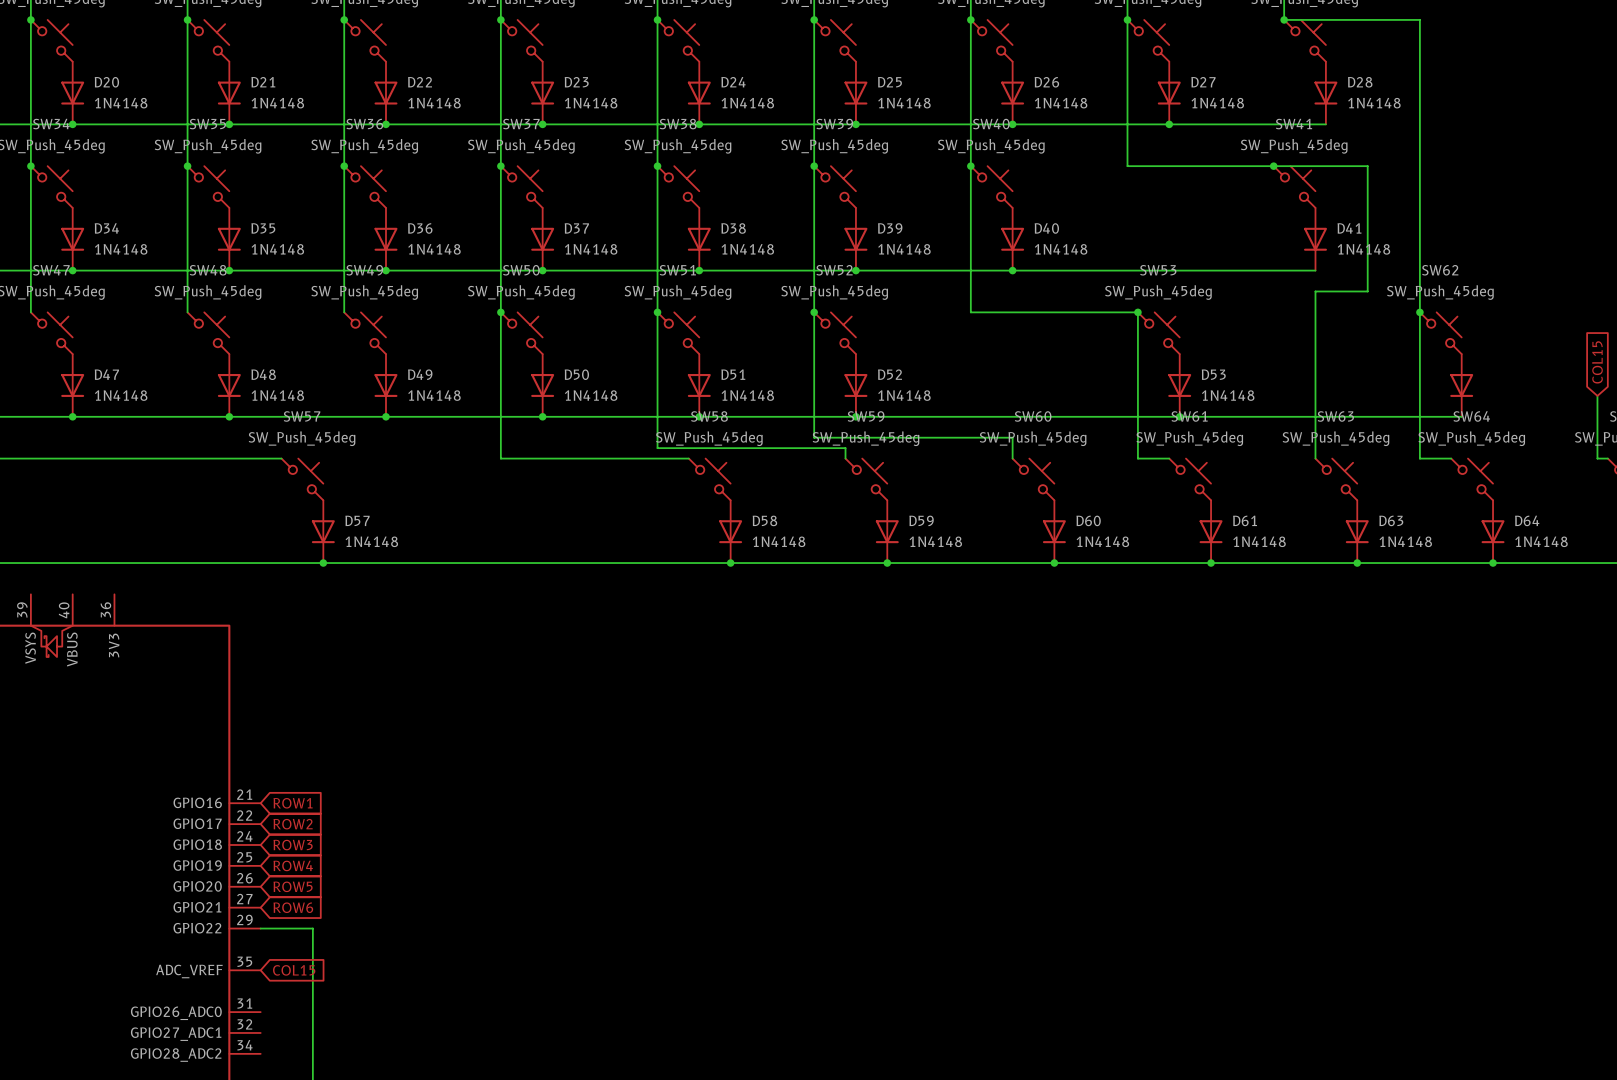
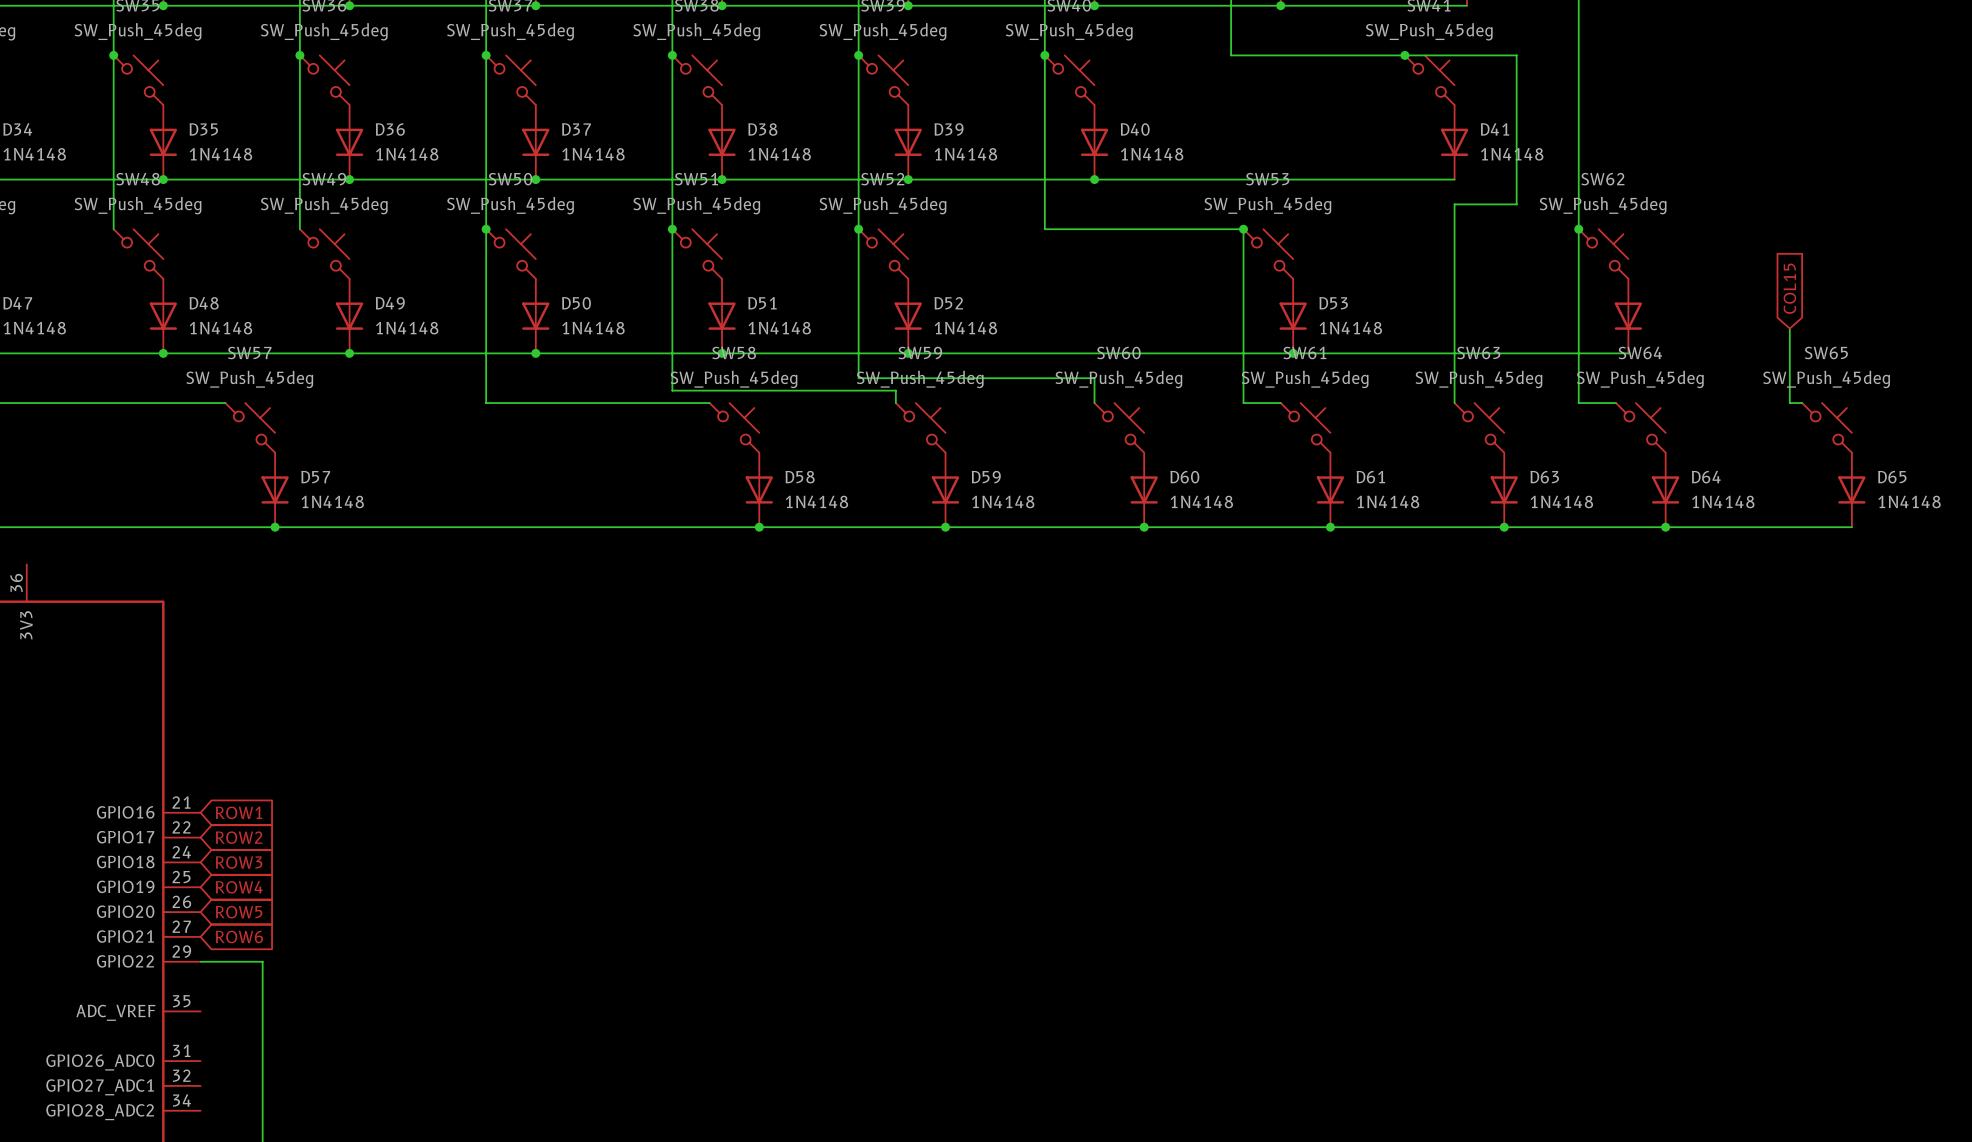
global label: COL15 (294, 970) -> none

